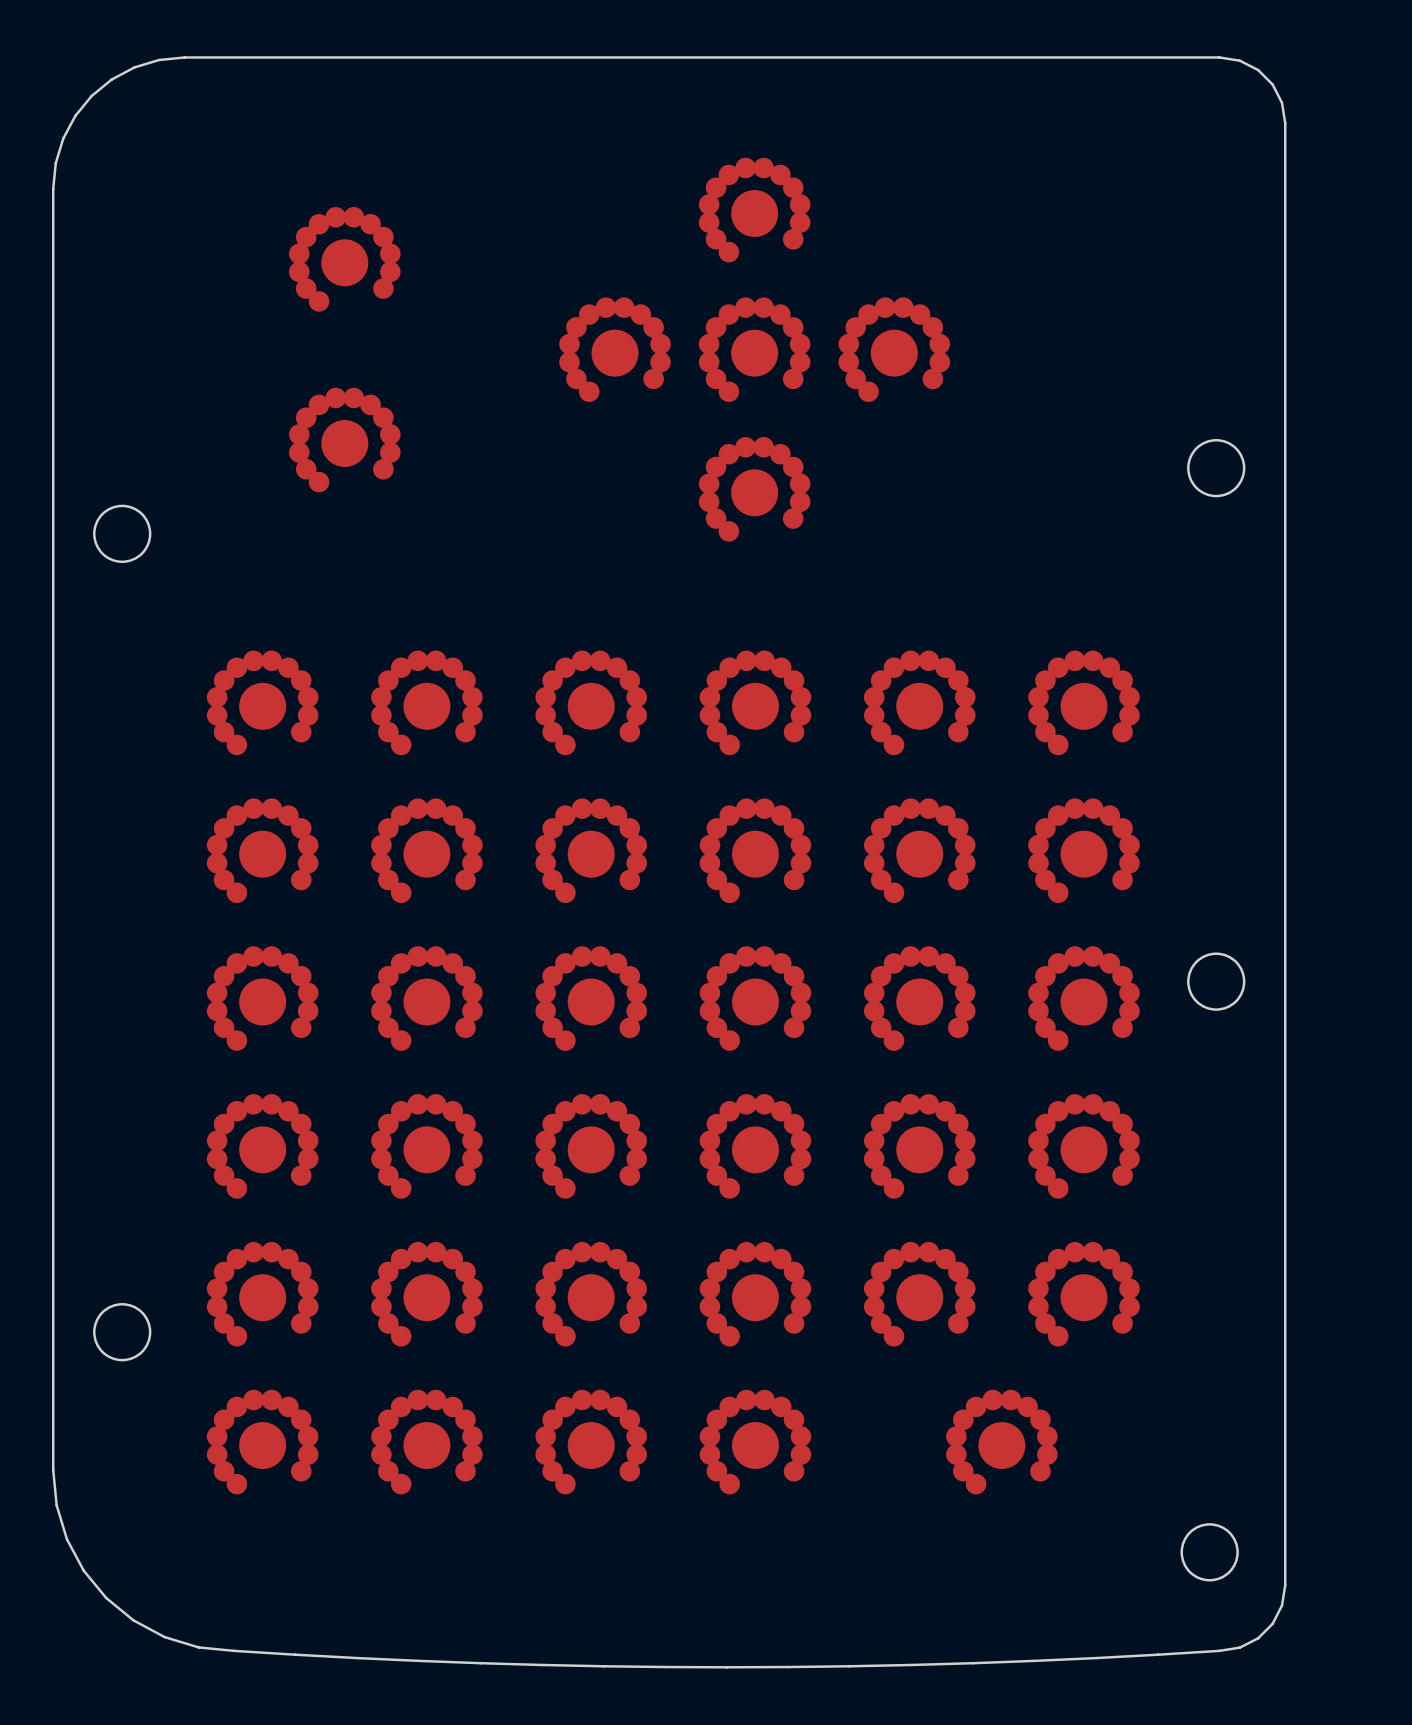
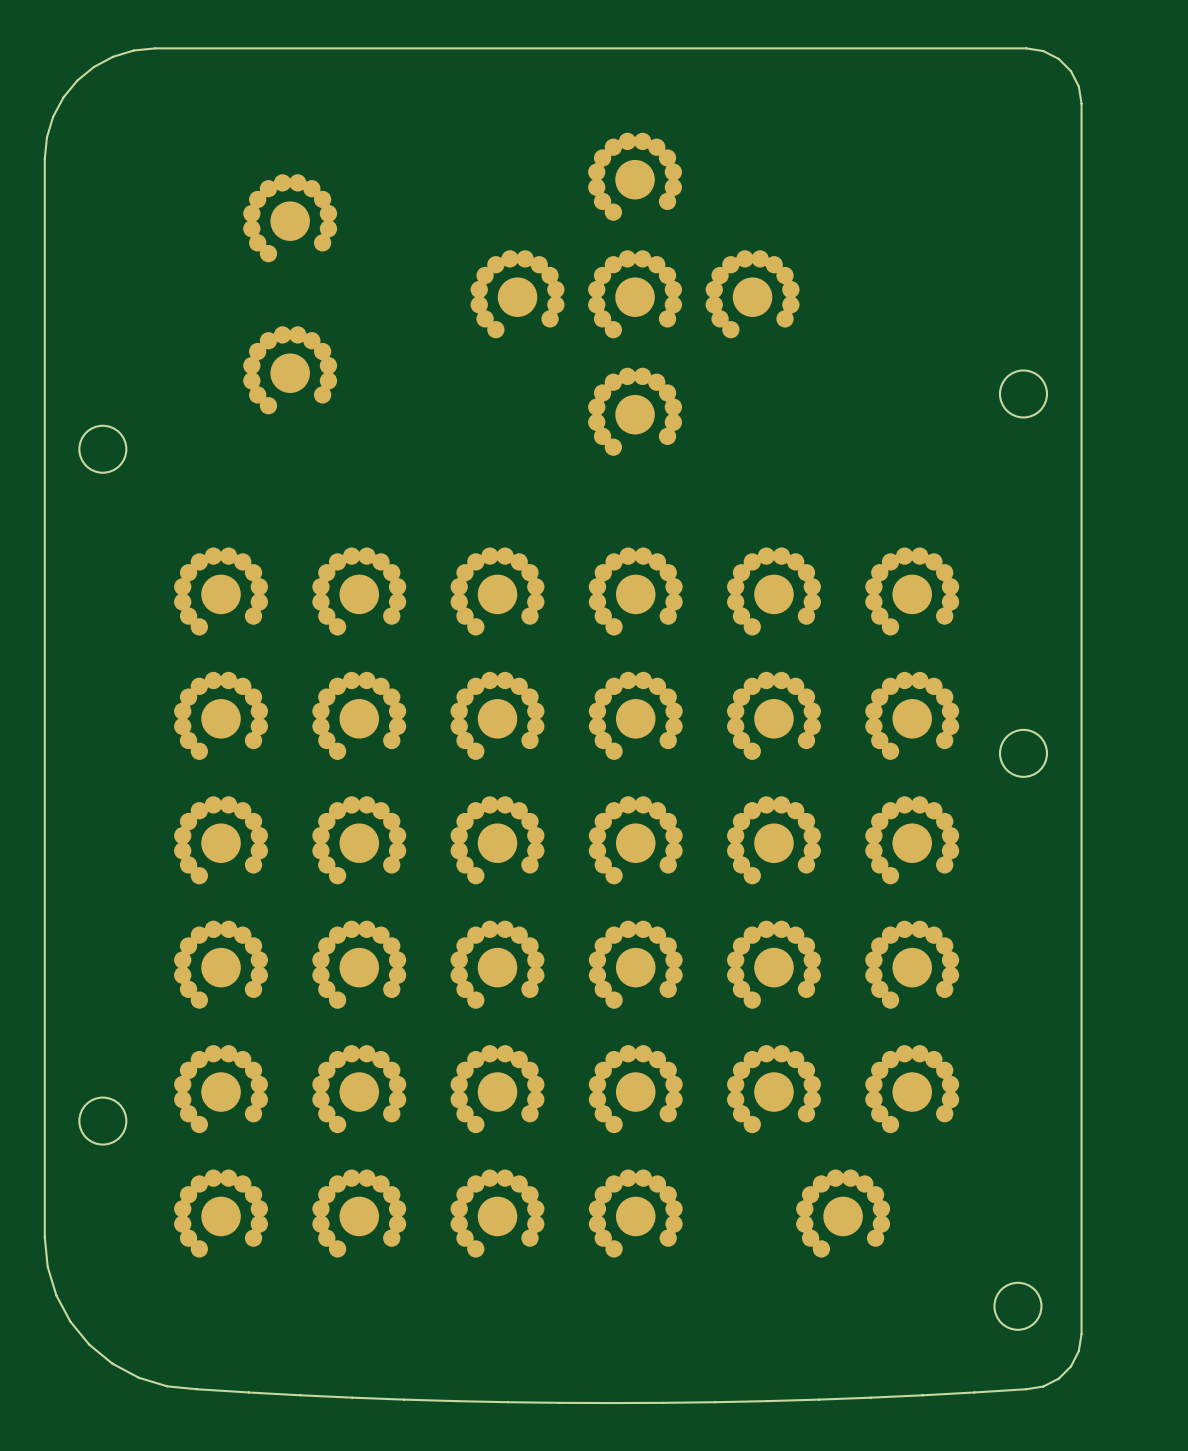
round board edge position: (1216, 981) -> (1023, 753)

